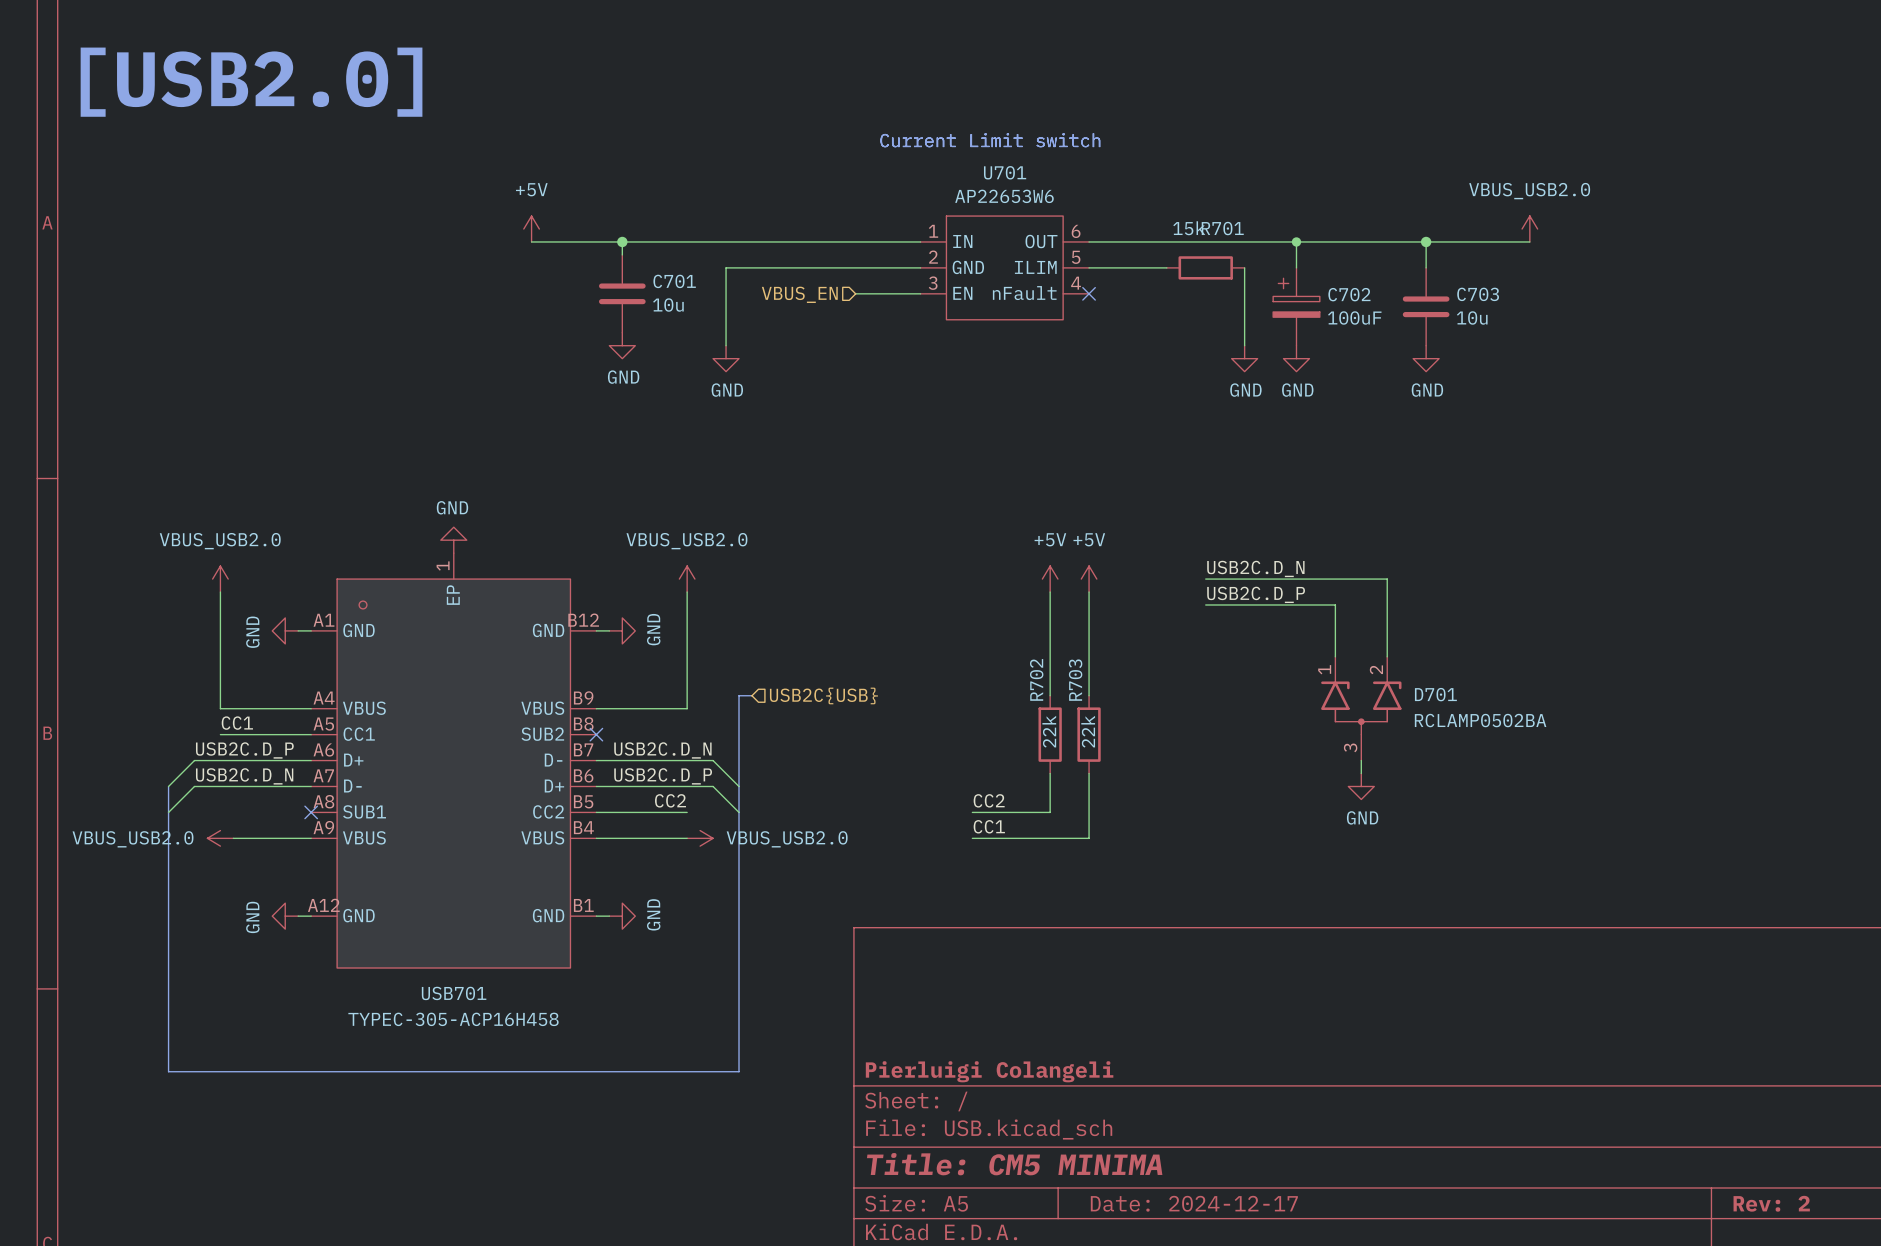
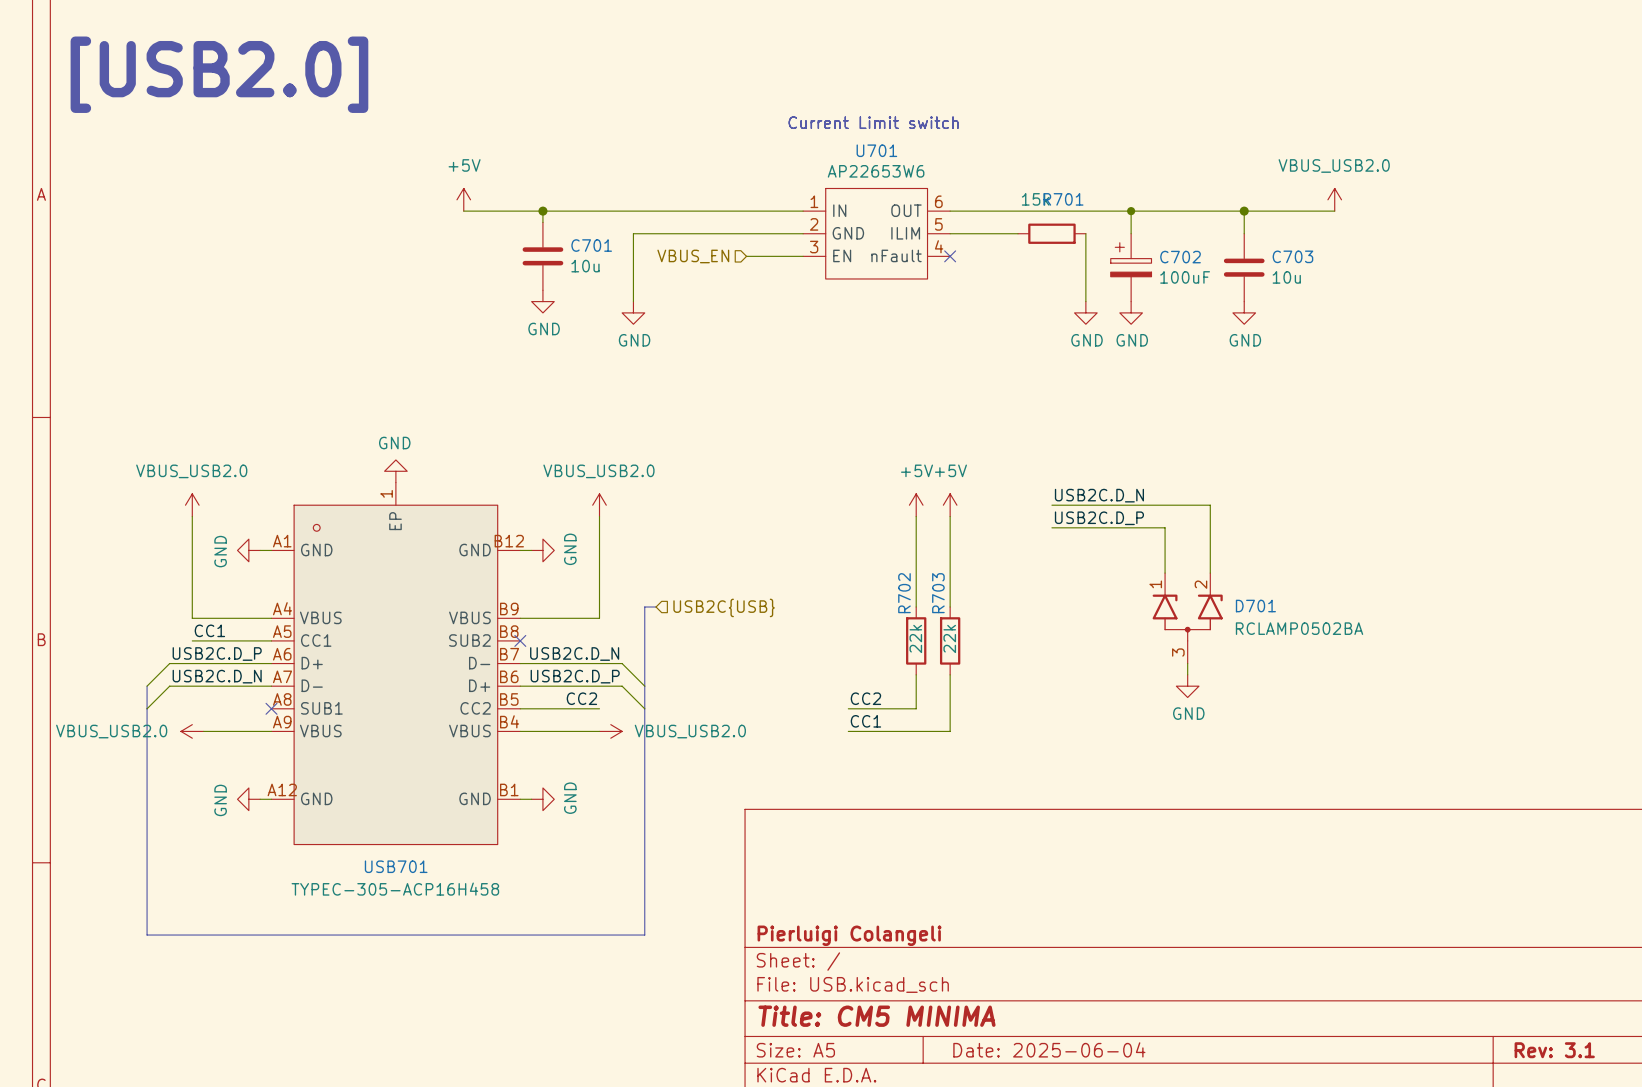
title block: Date: 2024-12-17 (1194, 1203) -> Date: 2025-06-04 (1049, 1049)
title block: Rev: 2 (1771, 1203) -> Rev: 3.1 (1554, 1050)

